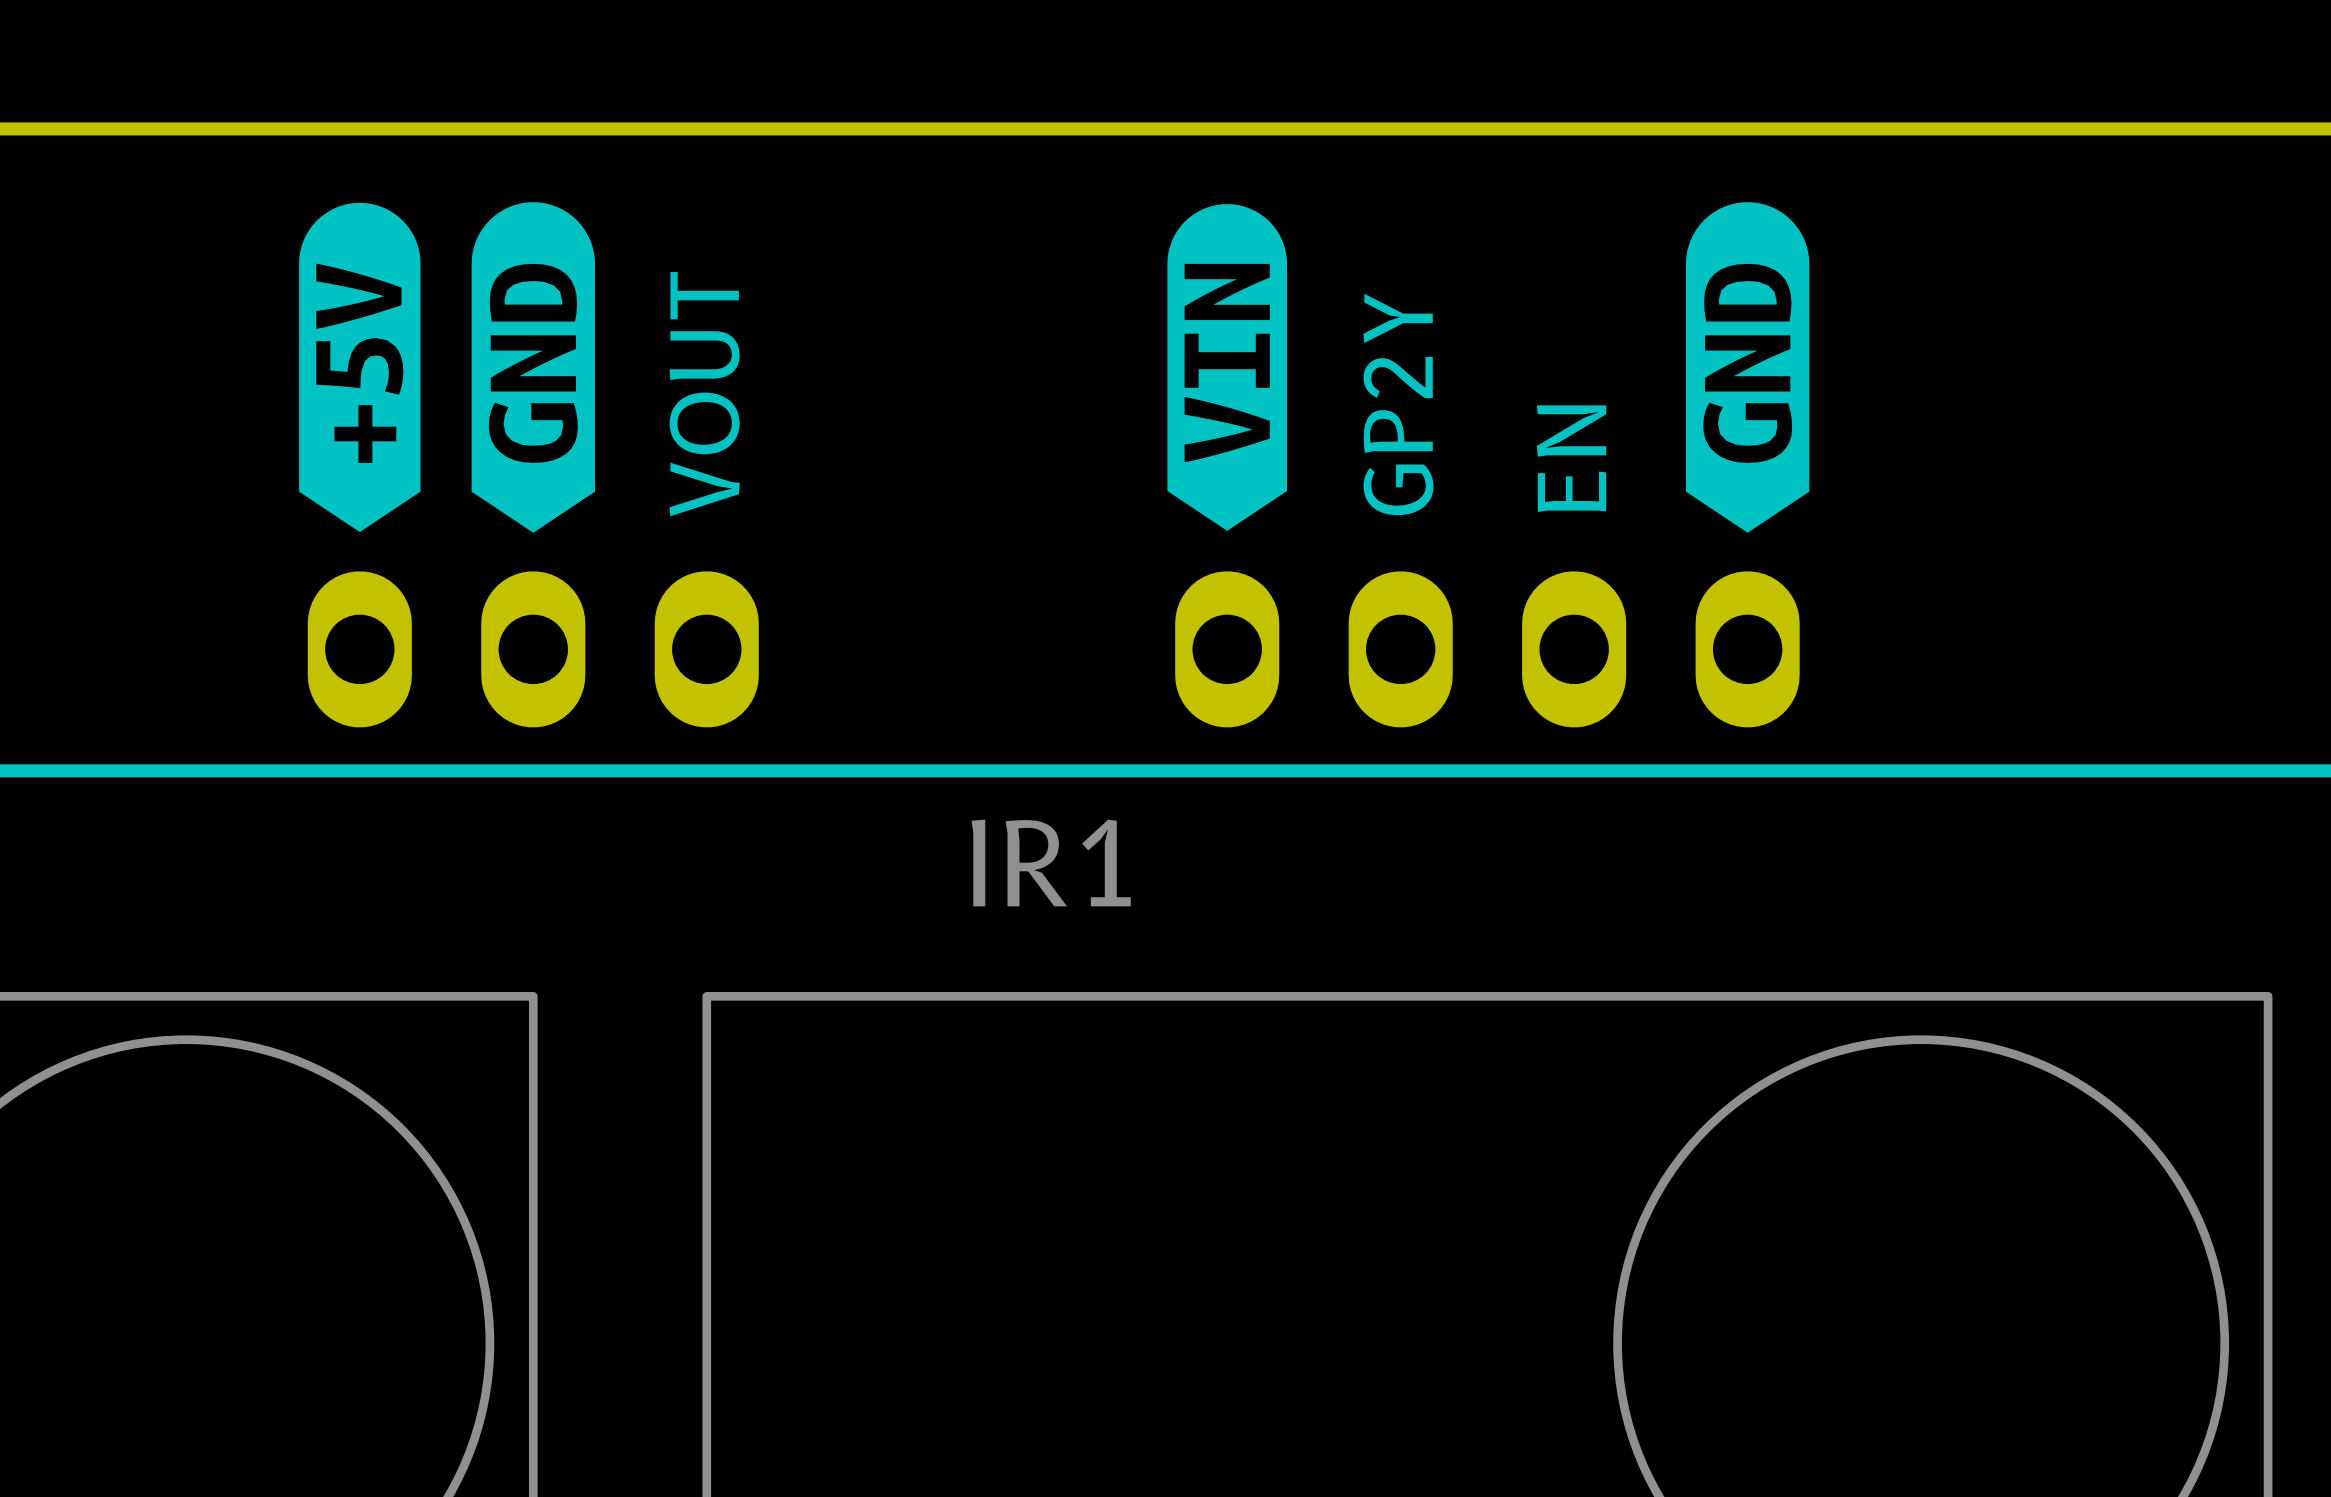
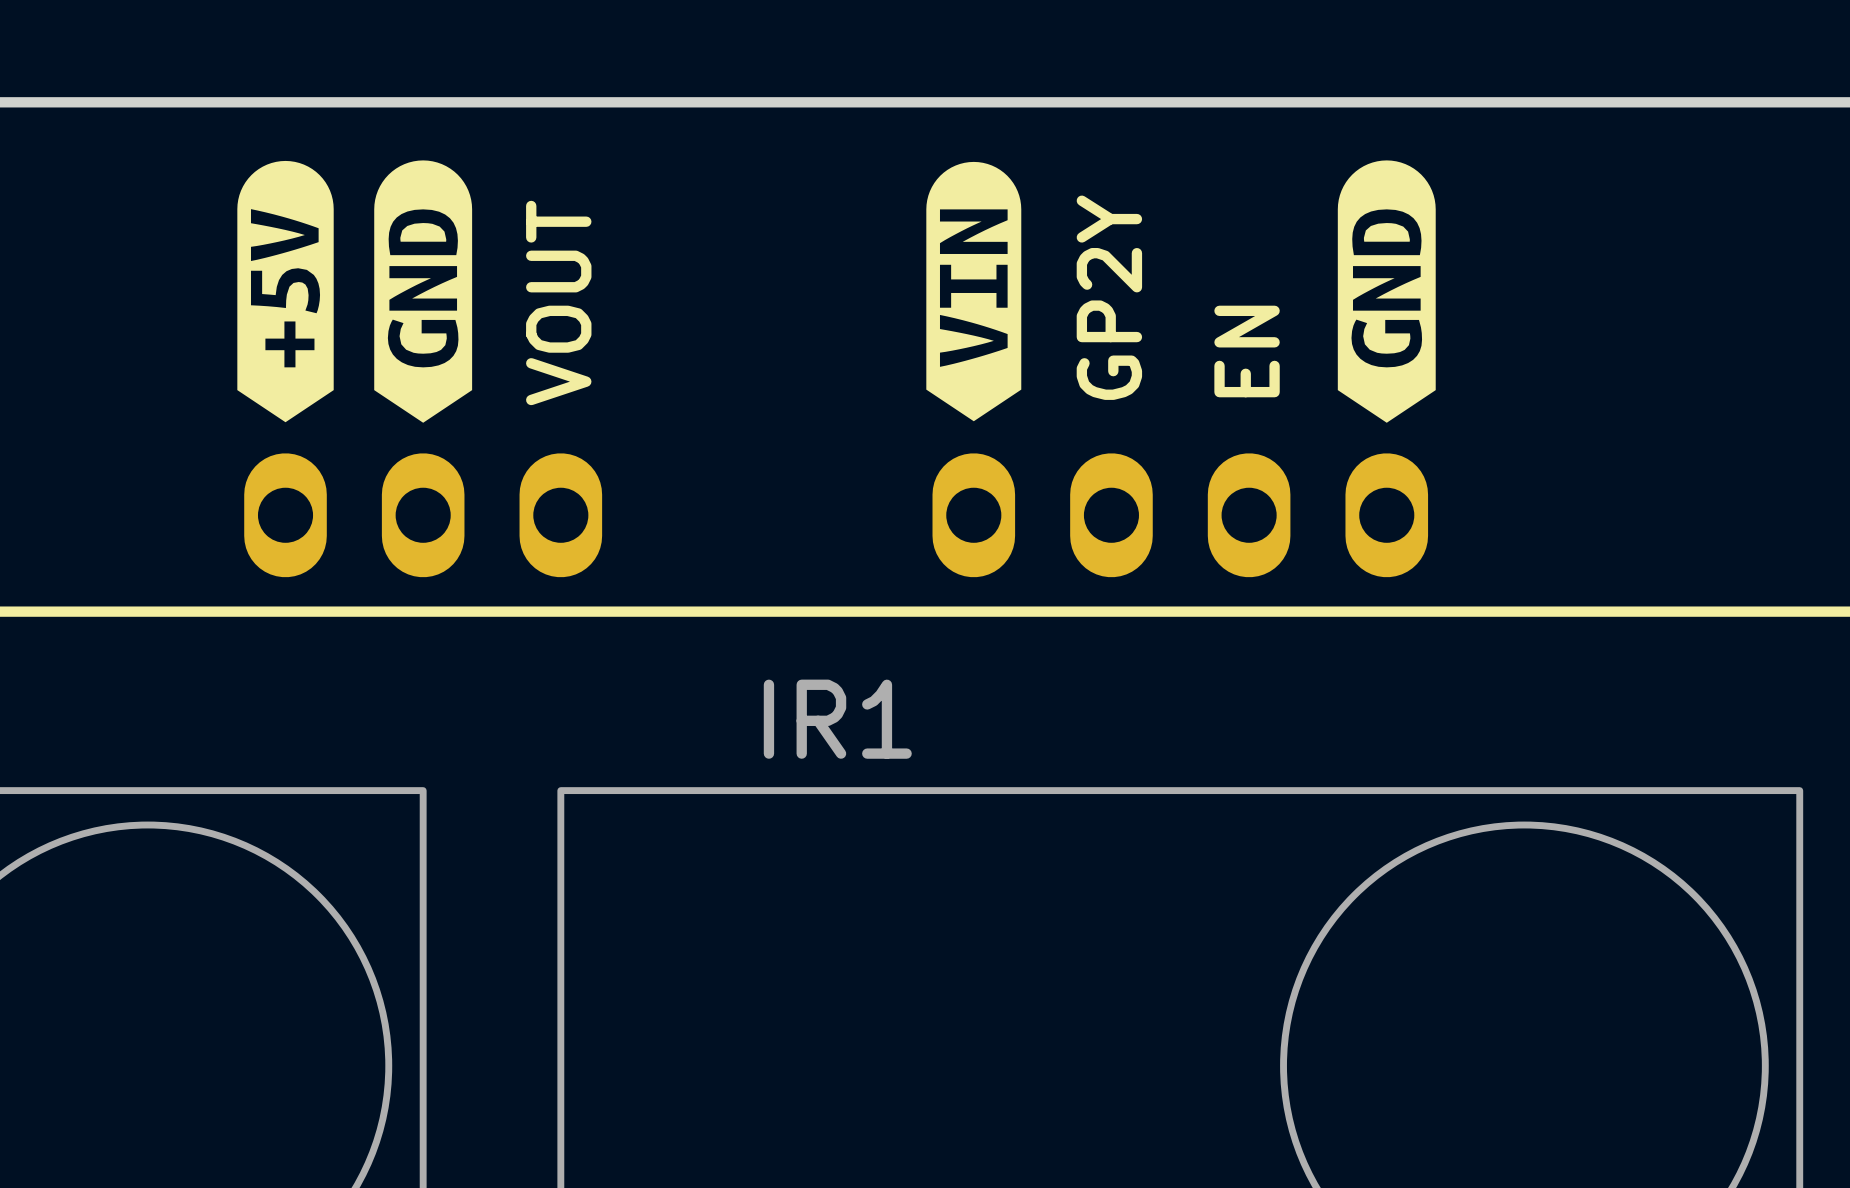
IR1 name position: IR1 (1051, 862) -> IR1 (837, 719)

